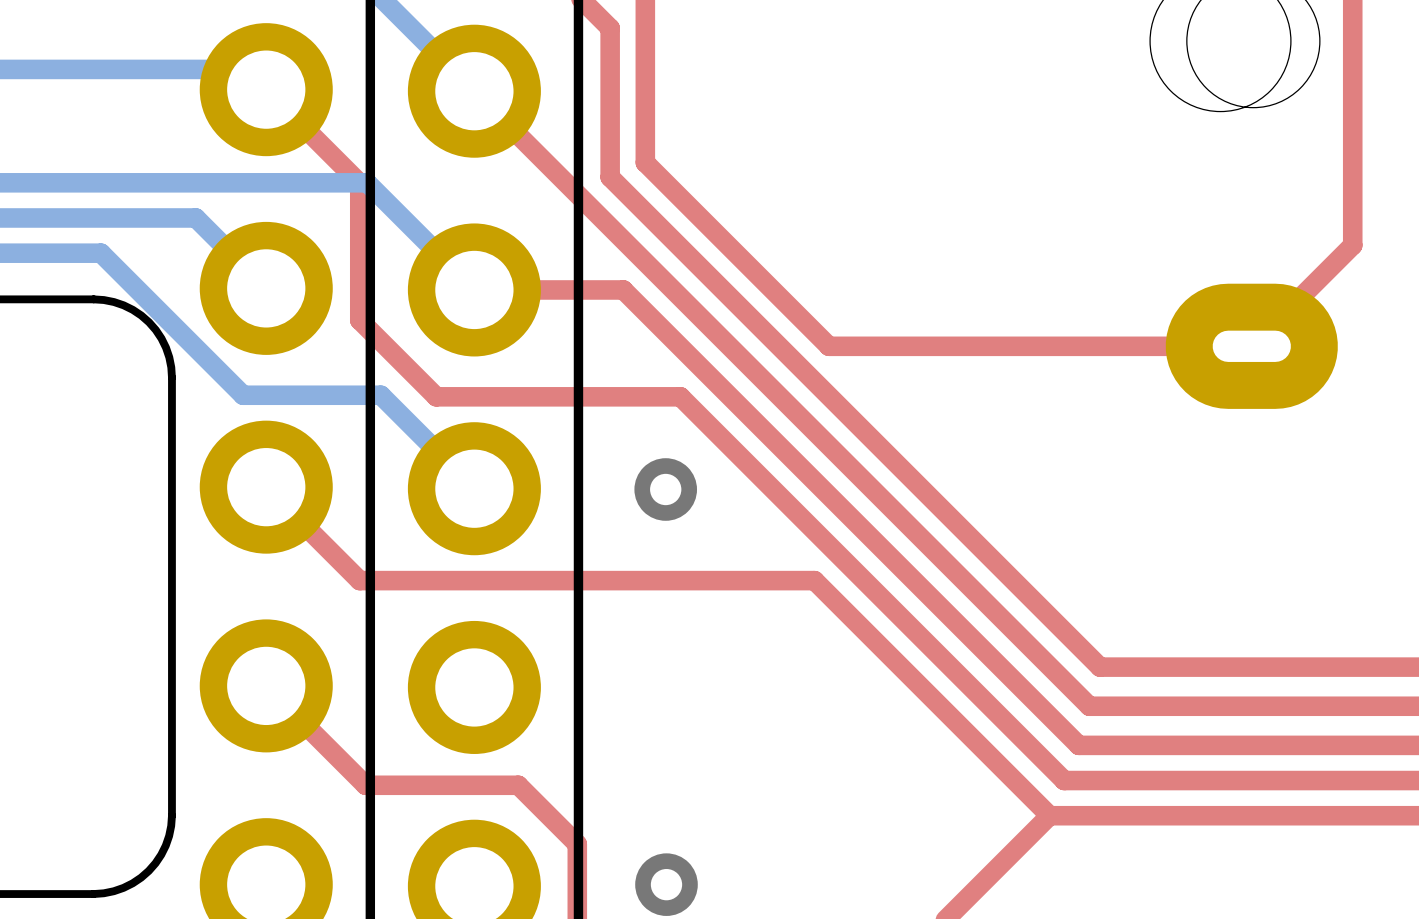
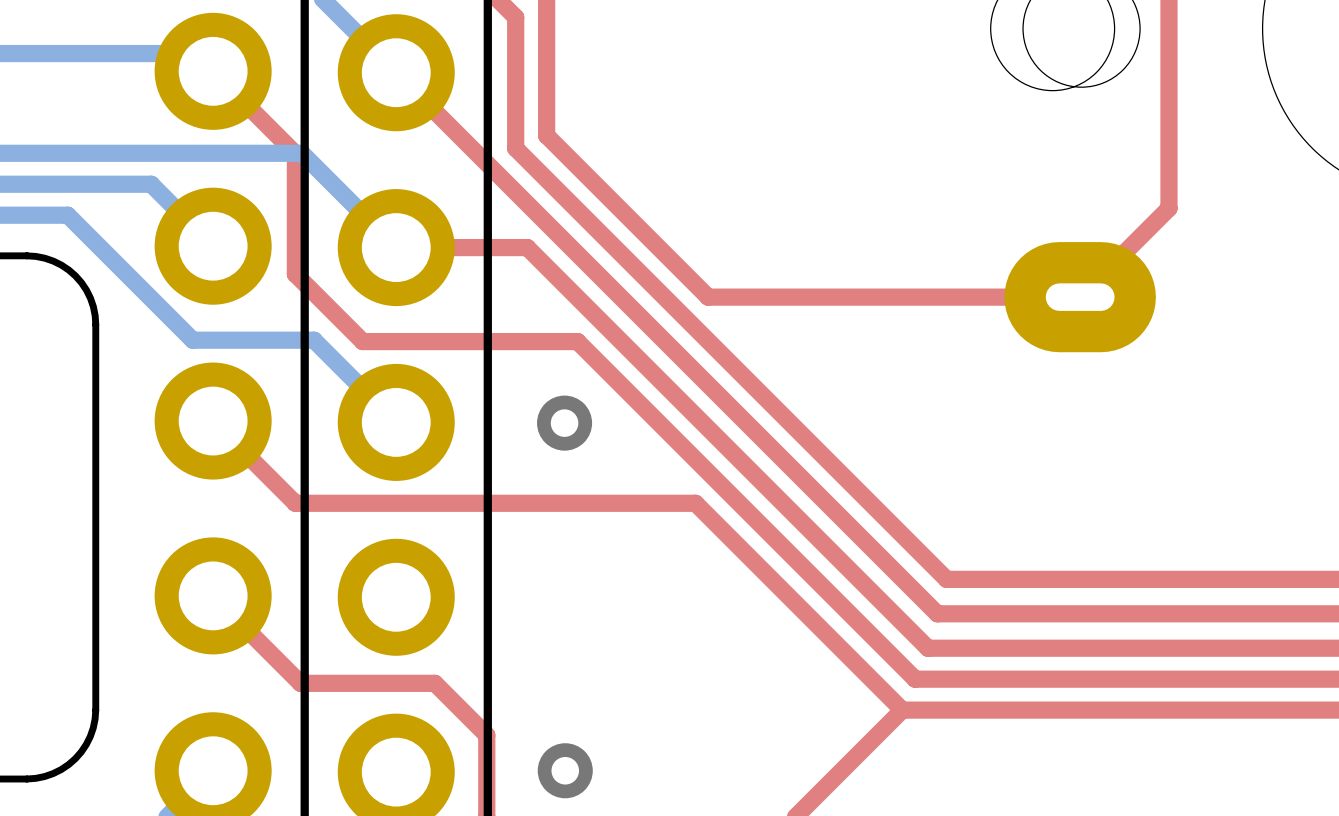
board edge: (54, 299) (103, 300) (132, 309) (149, 322) (161, 338) (169, 357) (171, 377) (171, 815) (169, 835) (155, 863) (132, 883) (103, 893) (54, 894) -> (26, 255) (53, 261) (75, 276) (90, 298) (95, 324) (95, 719) (90, 736) (75, 758) (53, 773) (26, 779)

